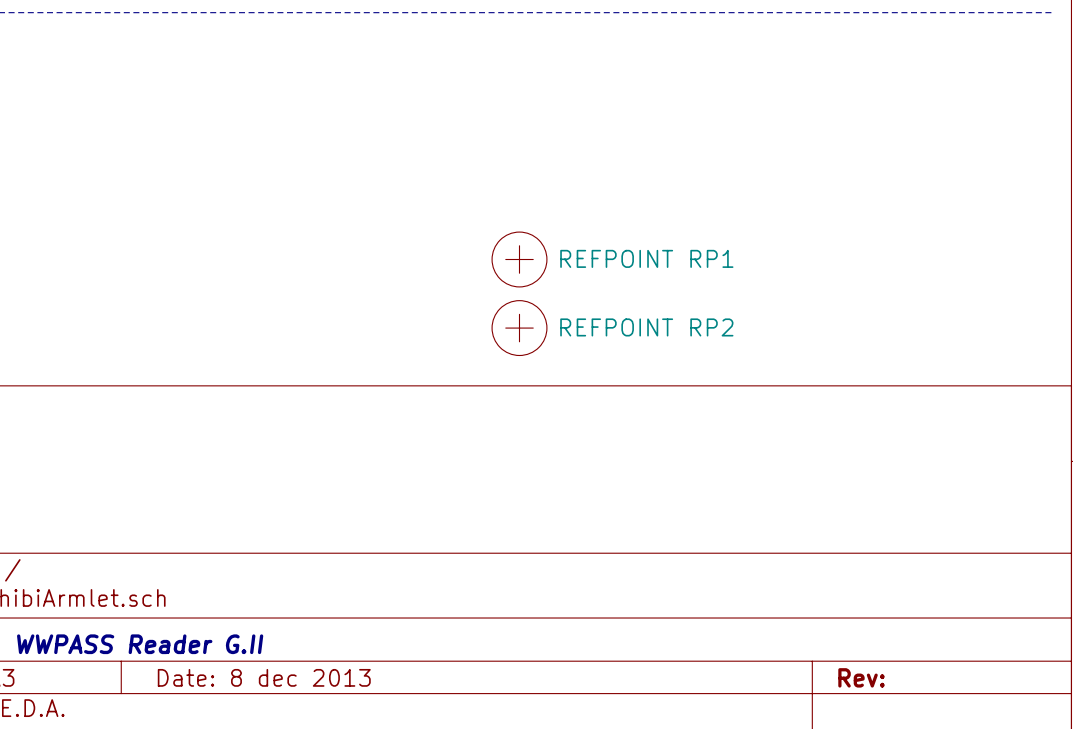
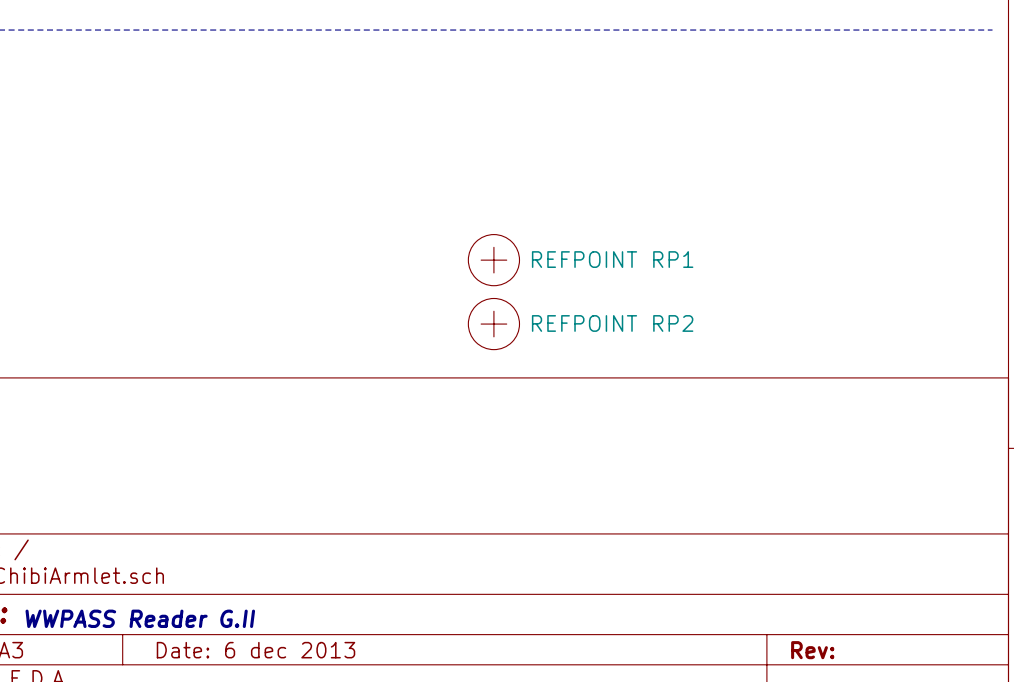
title block: Date: 8 dec 2013 (264, 677) -> Date: 6 dec 2013 (255, 650)

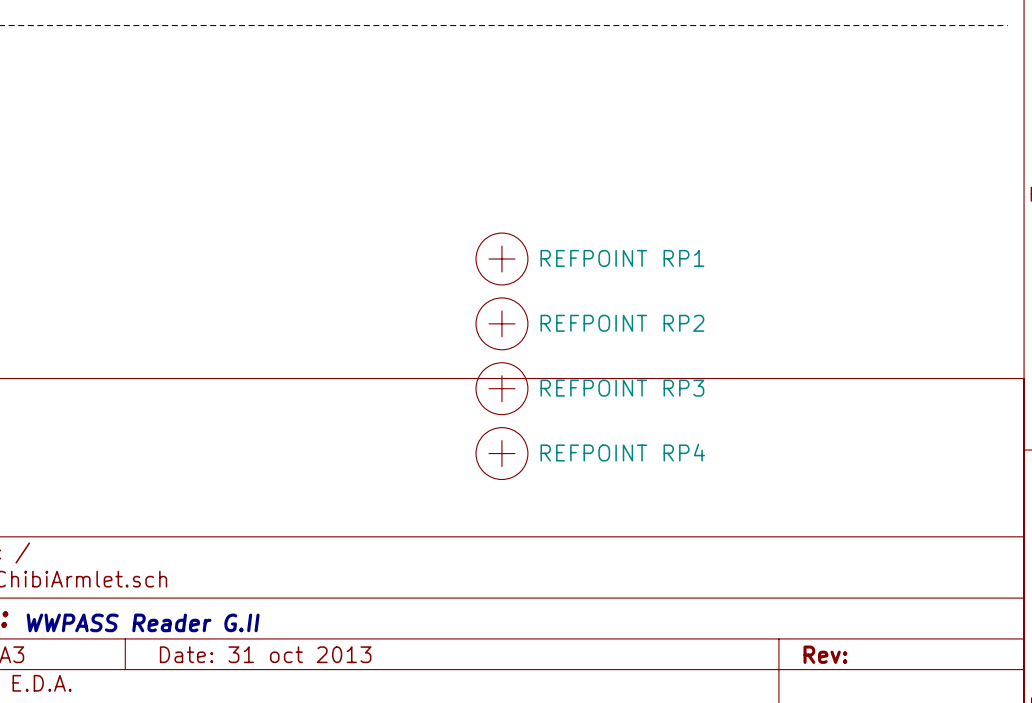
RP3: none -> REFPOINT (501, 388)
RP4: none -> REFPOINT (501, 453)
title block: Date: 6 dec 2013 (255, 650) -> Date: 31 oct 2013 (265, 654)

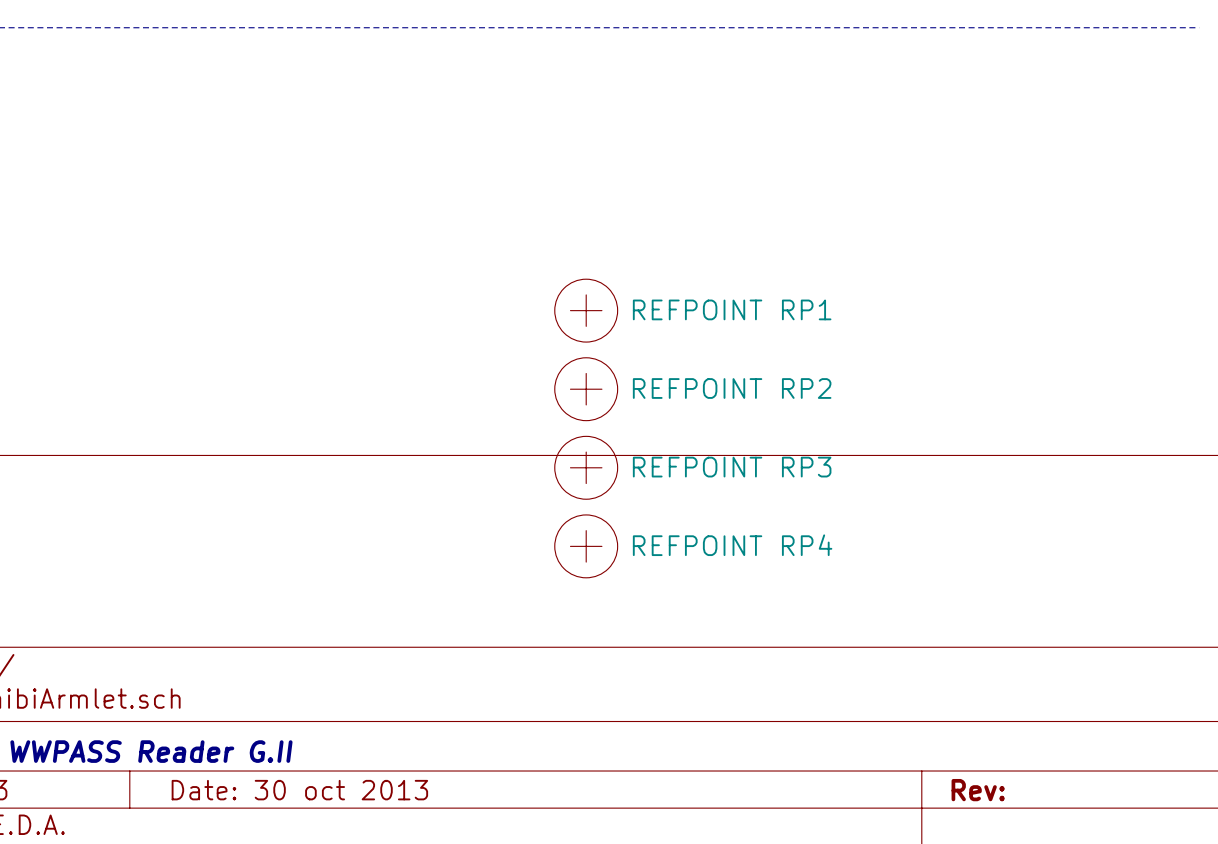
title block: Date: 31 oct 2013 (265, 654) -> Date: 30 oct 2013 (299, 790)

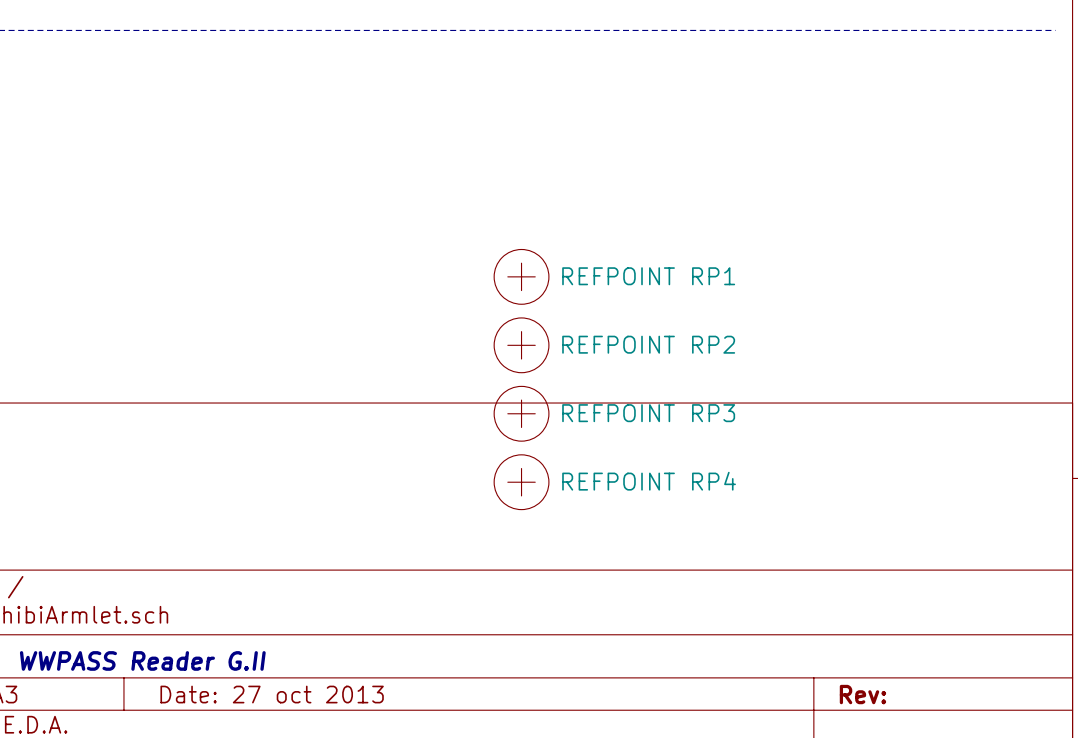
title block: Date: 30 oct 2013 (299, 790) -> Date: 27 oct 2013 (272, 694)

